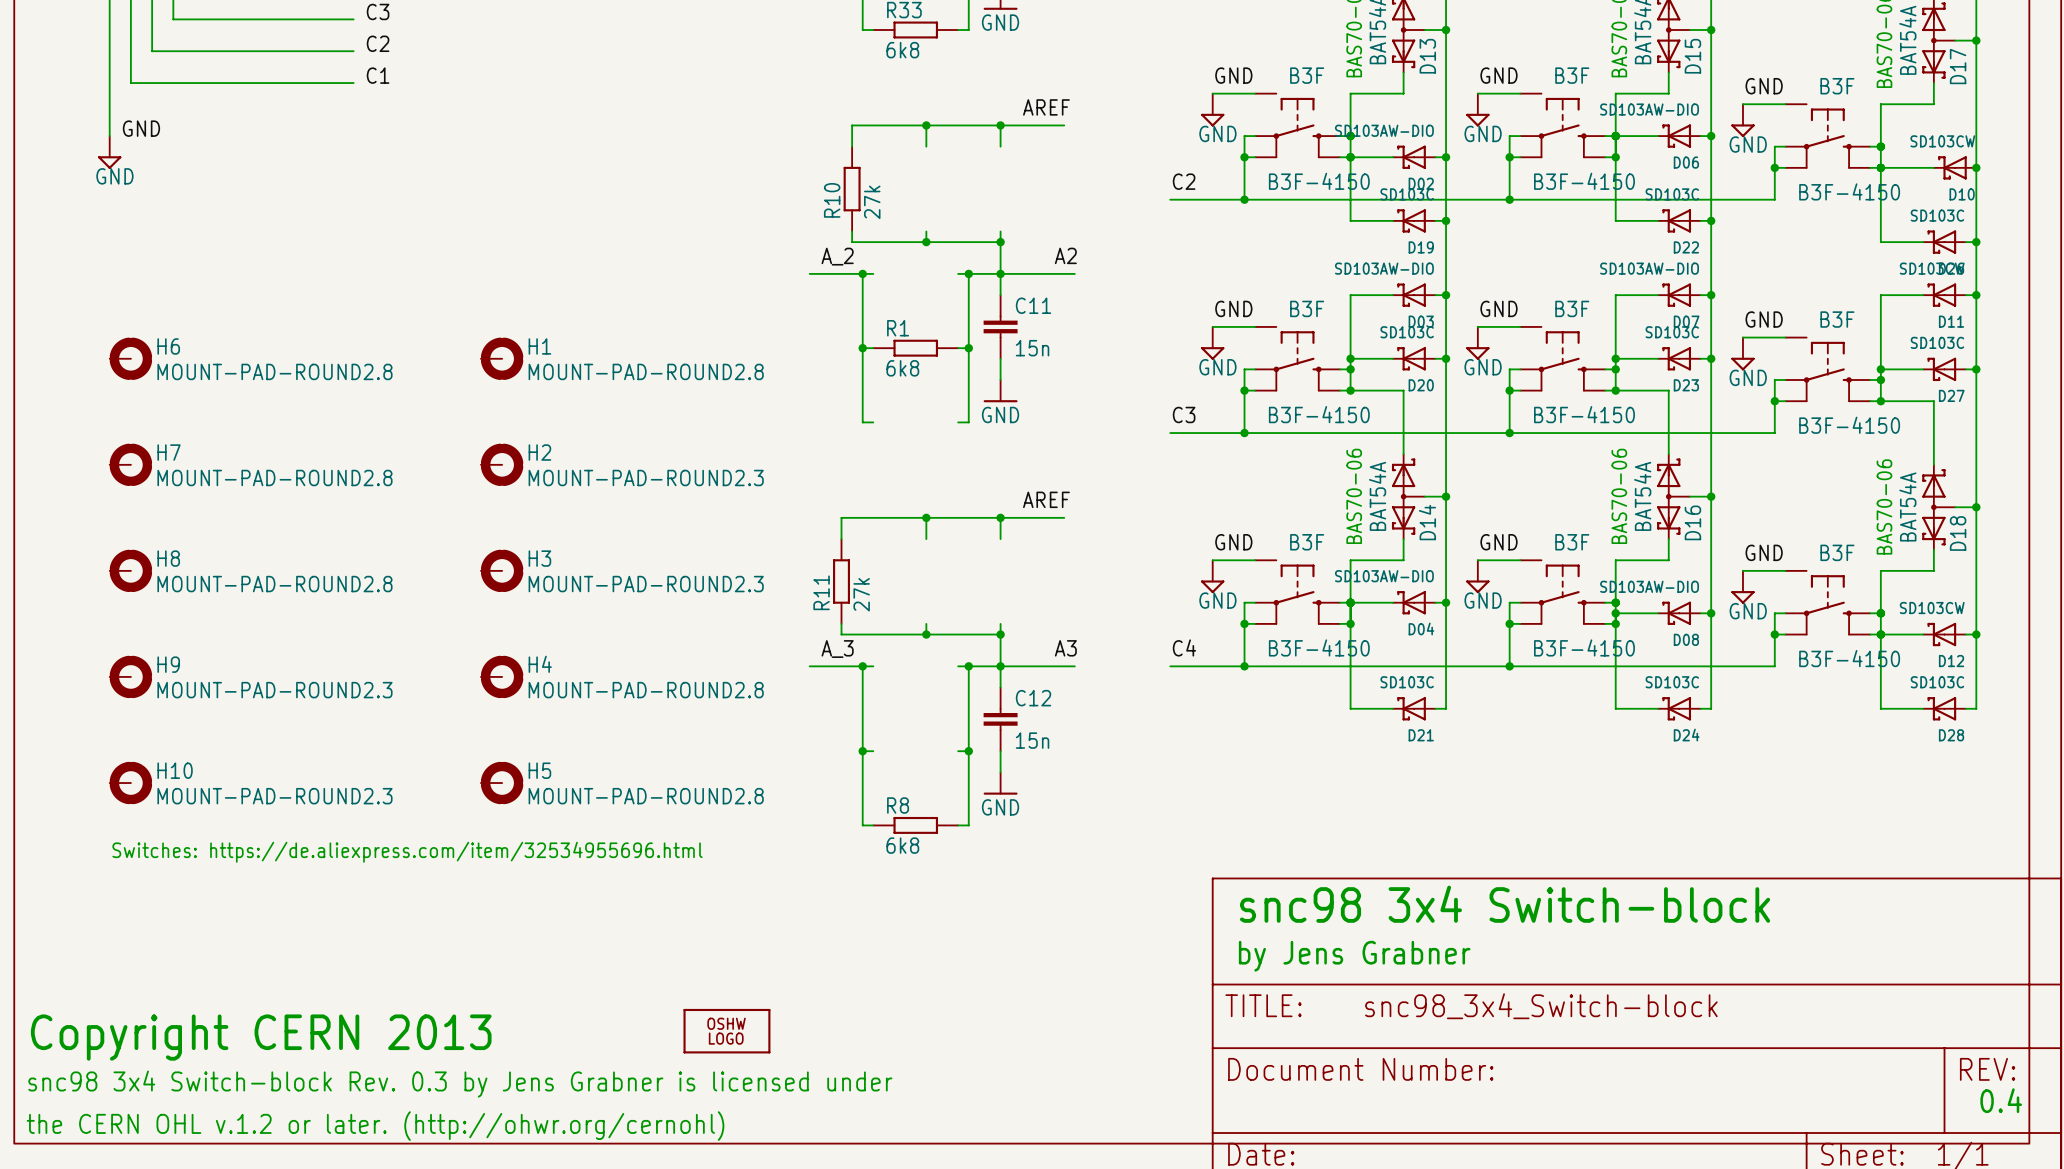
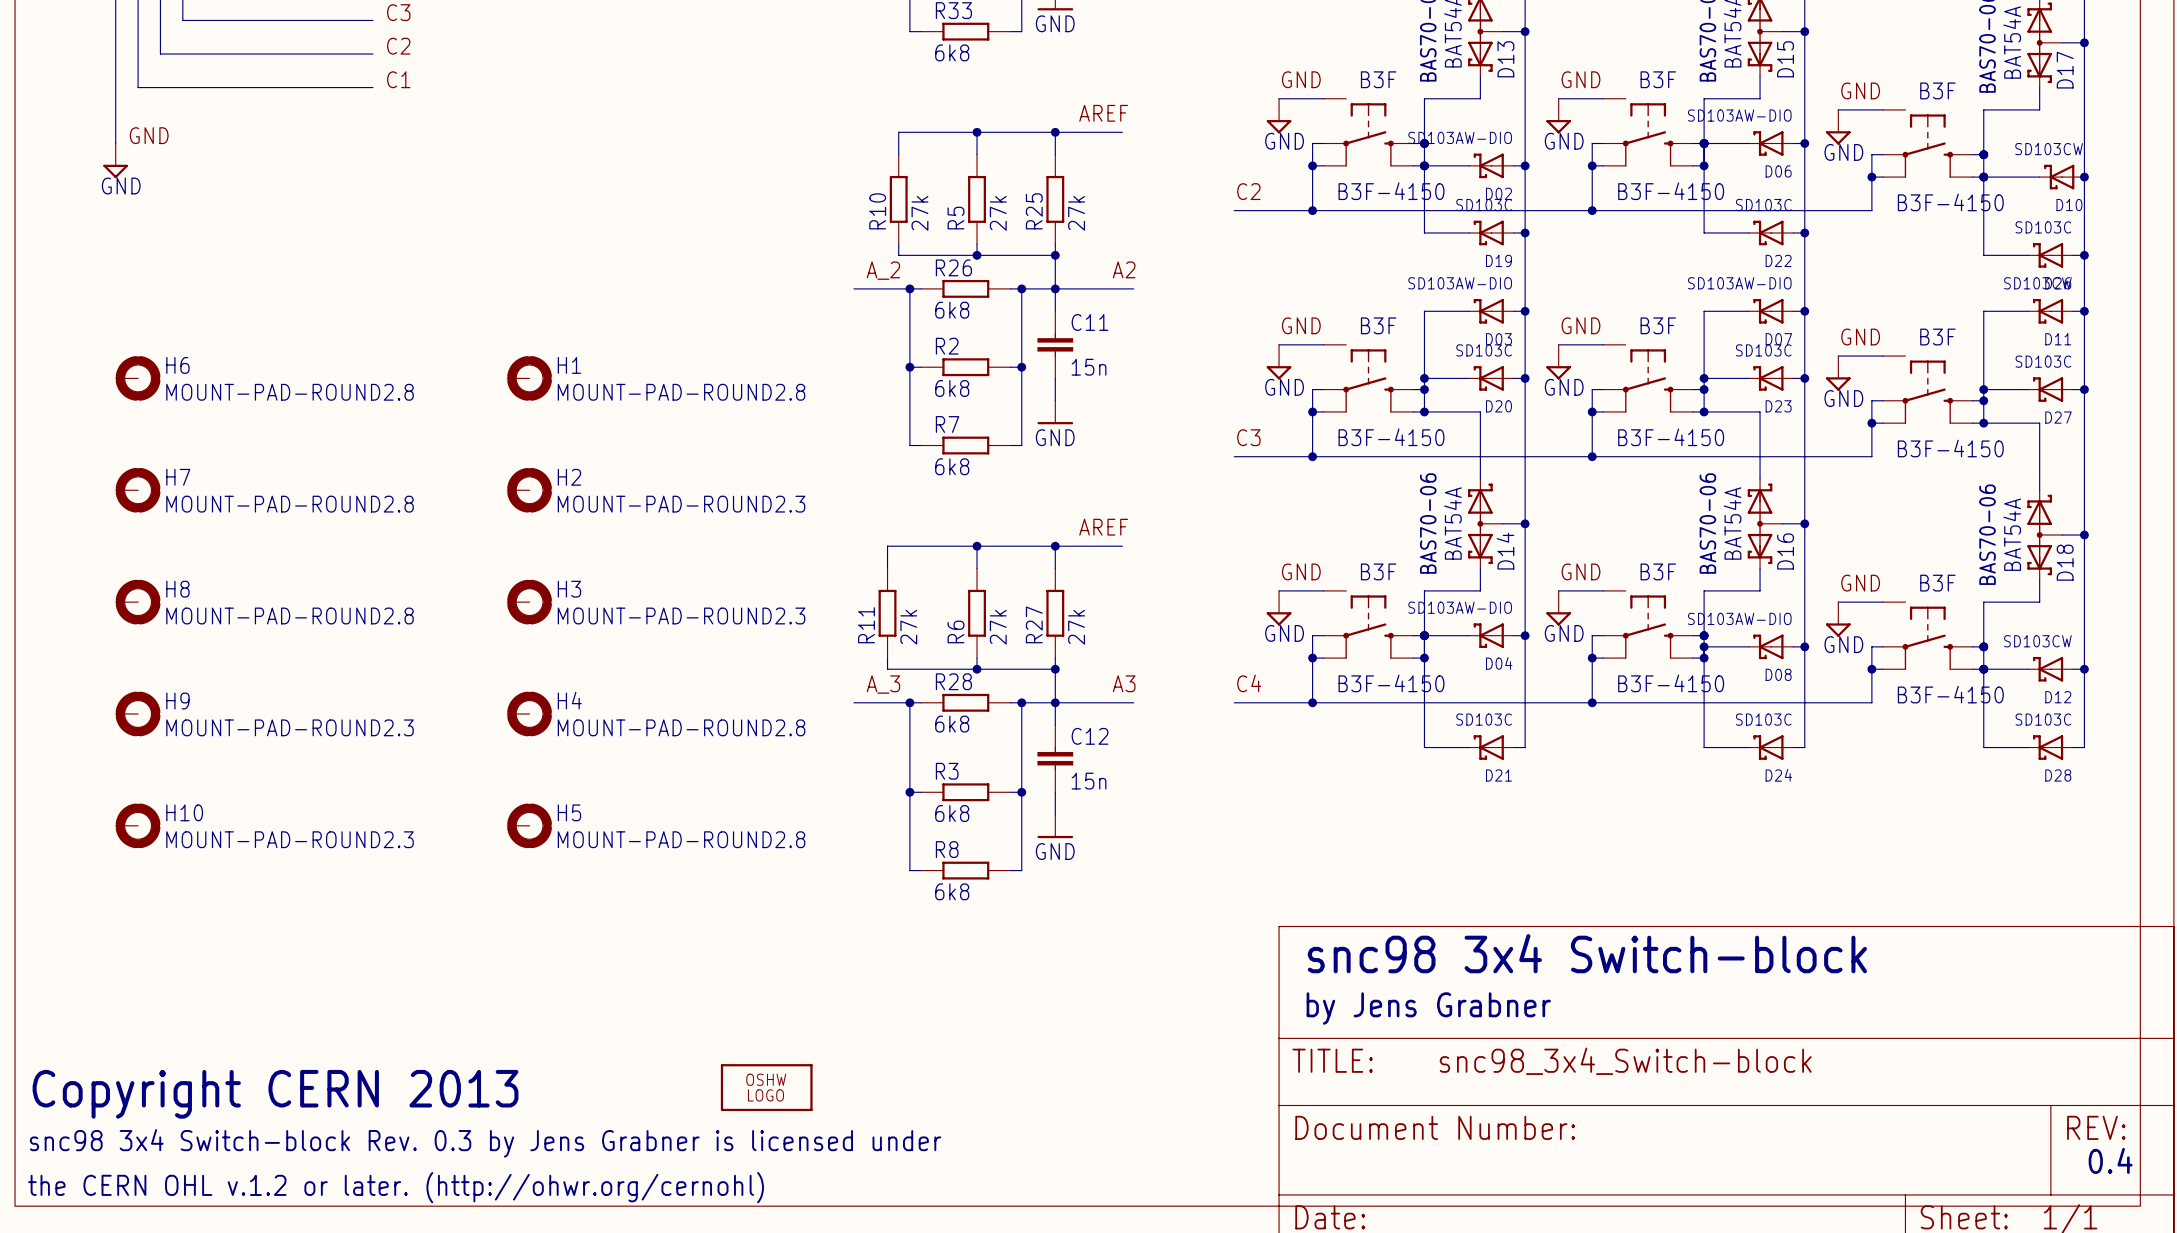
R5: none -> 27k (977, 199)
R25: none -> 27k (1055, 199)
R26: none -> 6k8 (965, 288)
R1 name: R1 (898, 328) -> R2 (947, 346)
R7: none -> 6k8 (965, 445)
R6: none -> 27k (977, 613)
R27: none -> 27k (1055, 613)
R28: none -> 6k8 (965, 702)
R3: none -> 6k8 (965, 792)
text: Switches: https://de.aliexpress.com/item/32534955696.html (407, 852) -> none

